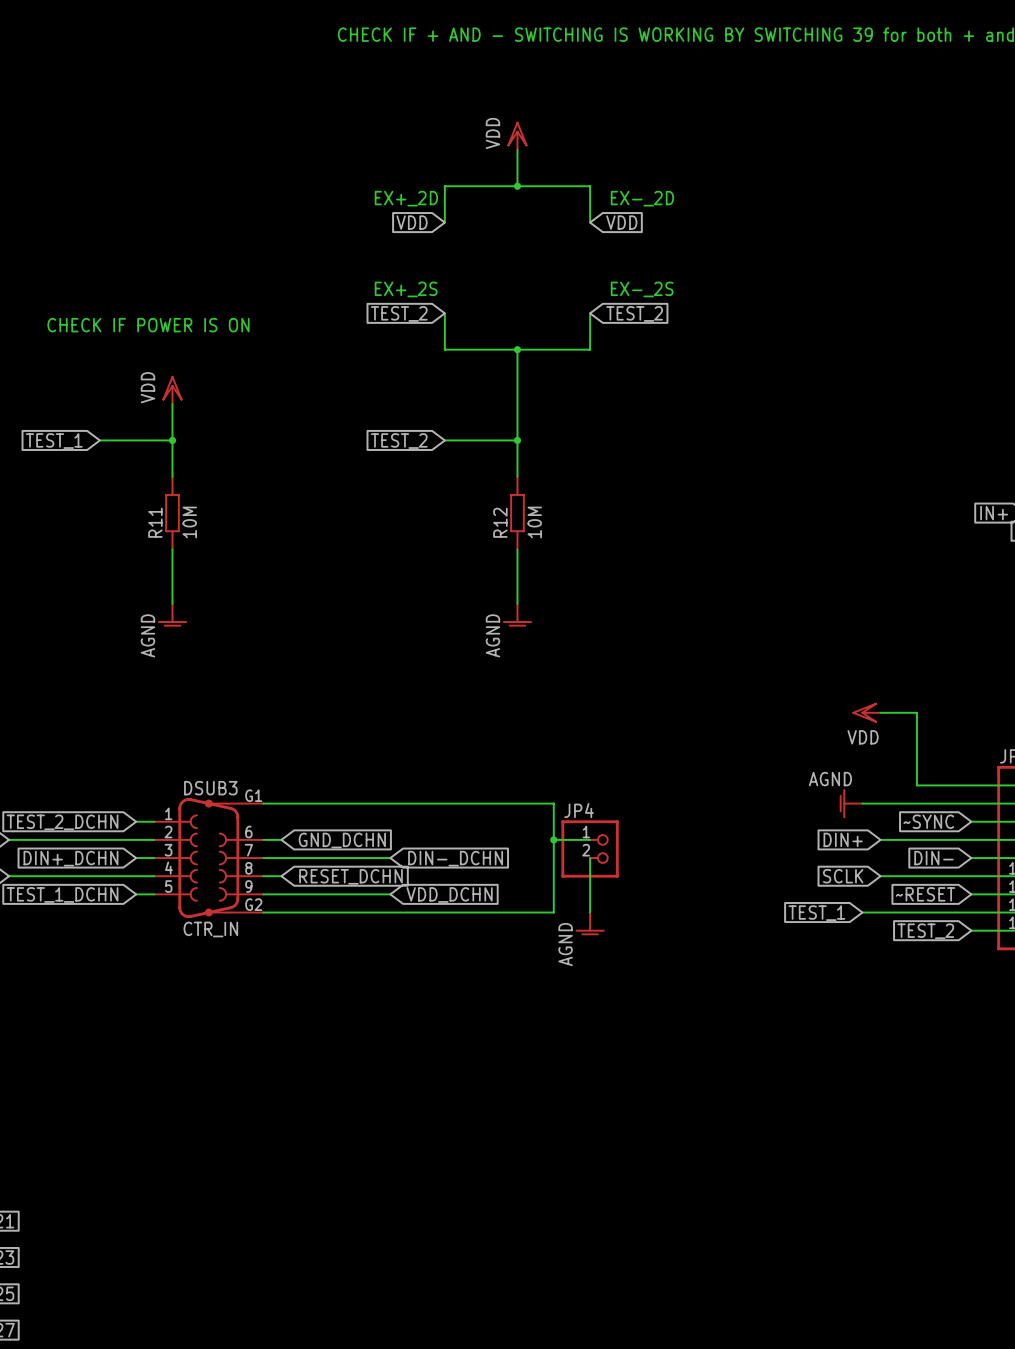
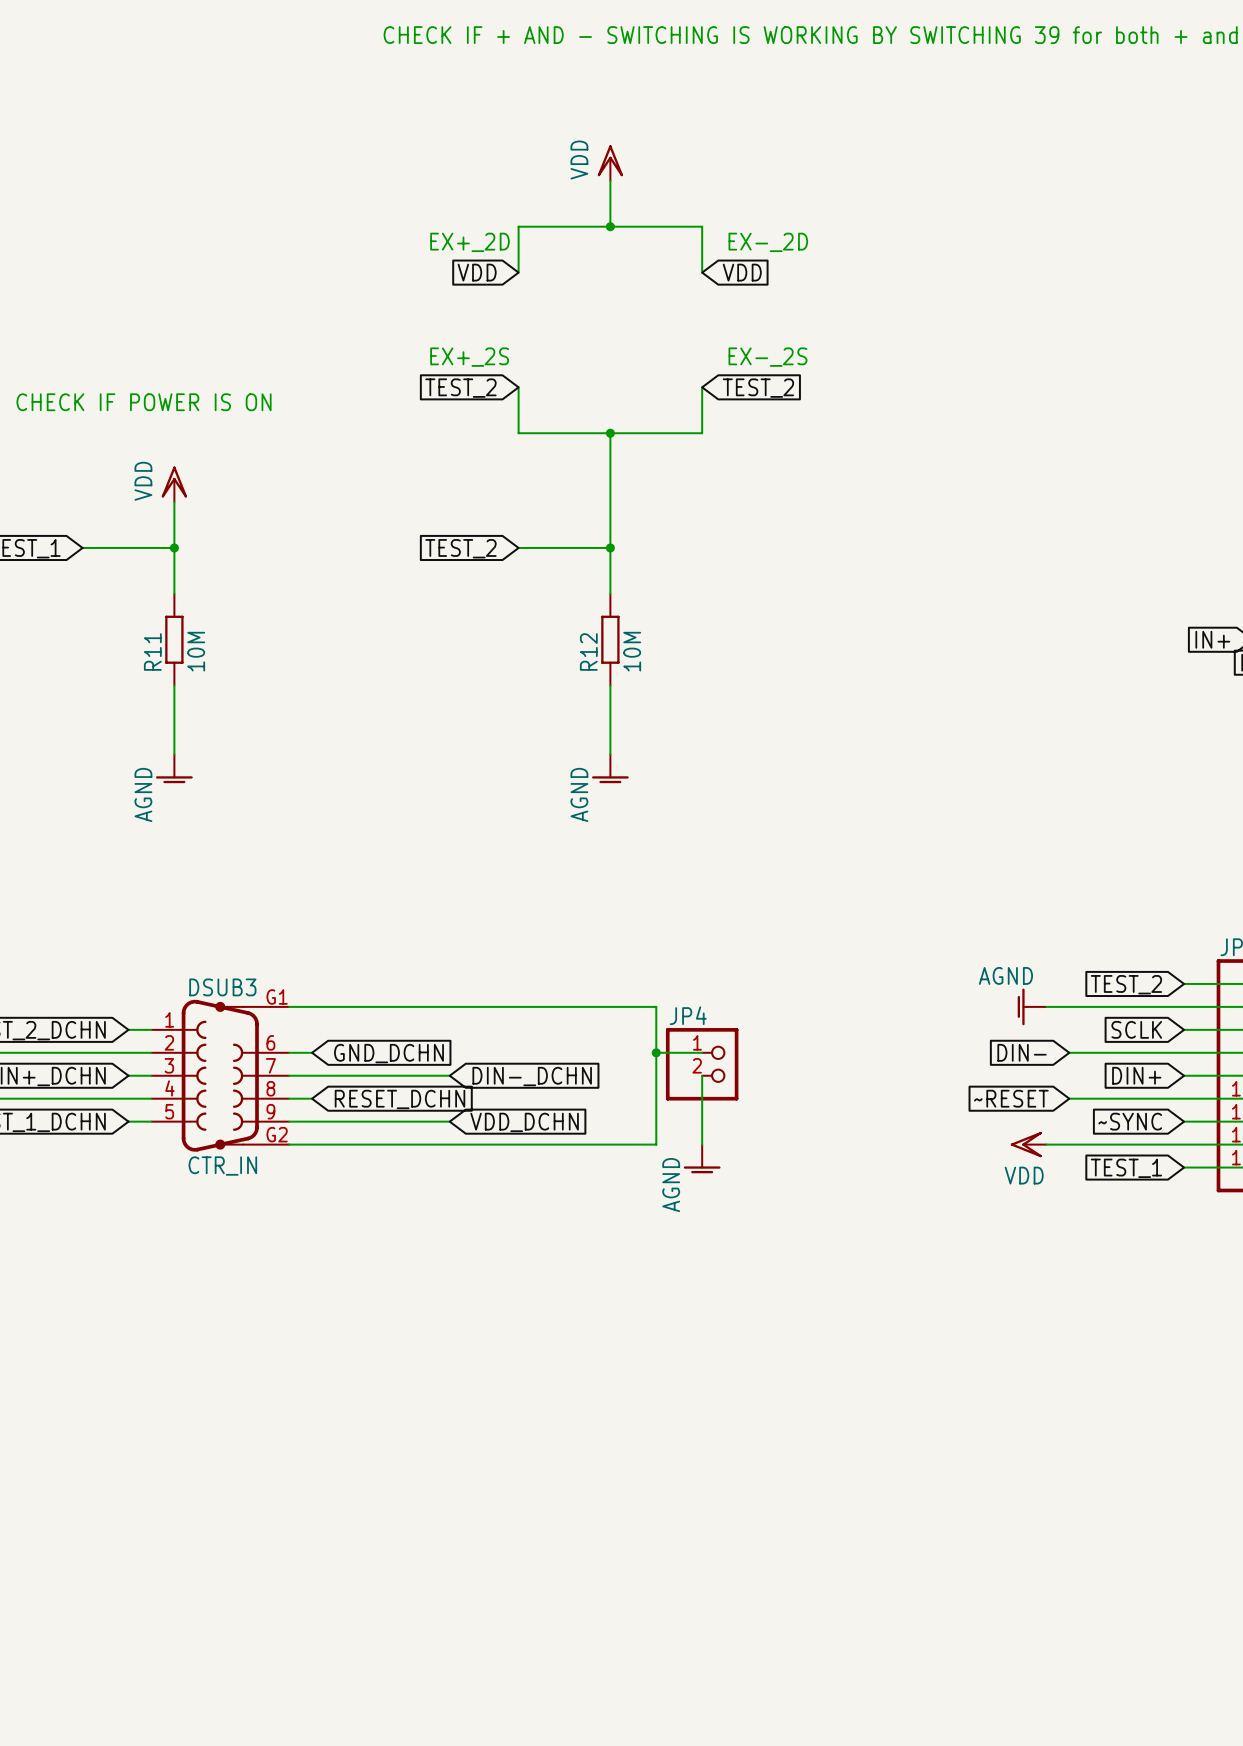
power symbol: VDD (866, 712) -> none
wire: (880, 712) (916, 712) (916, 785) (971, 785) -> none
global label: none -> TEST_2 (1126, 984)
global label: ~SYNC (928, 821) -> SCLK (1136, 1029)
global label: DIN+ (843, 839) -> DIN- (1022, 1052)
global label: DIN- (933, 858) -> DIN+ (1136, 1075)
global label: SCLK (843, 876) -> ~RESET (1011, 1098)
global label: ~RESET (925, 894) -> ~SYNC (1130, 1121)
power symbol: none -> VDD (1028, 1144)
global label: TEST_1 (816, 913) -> none
global label: TEST_2 (925, 931) -> TEST_1 (1126, 1168)

